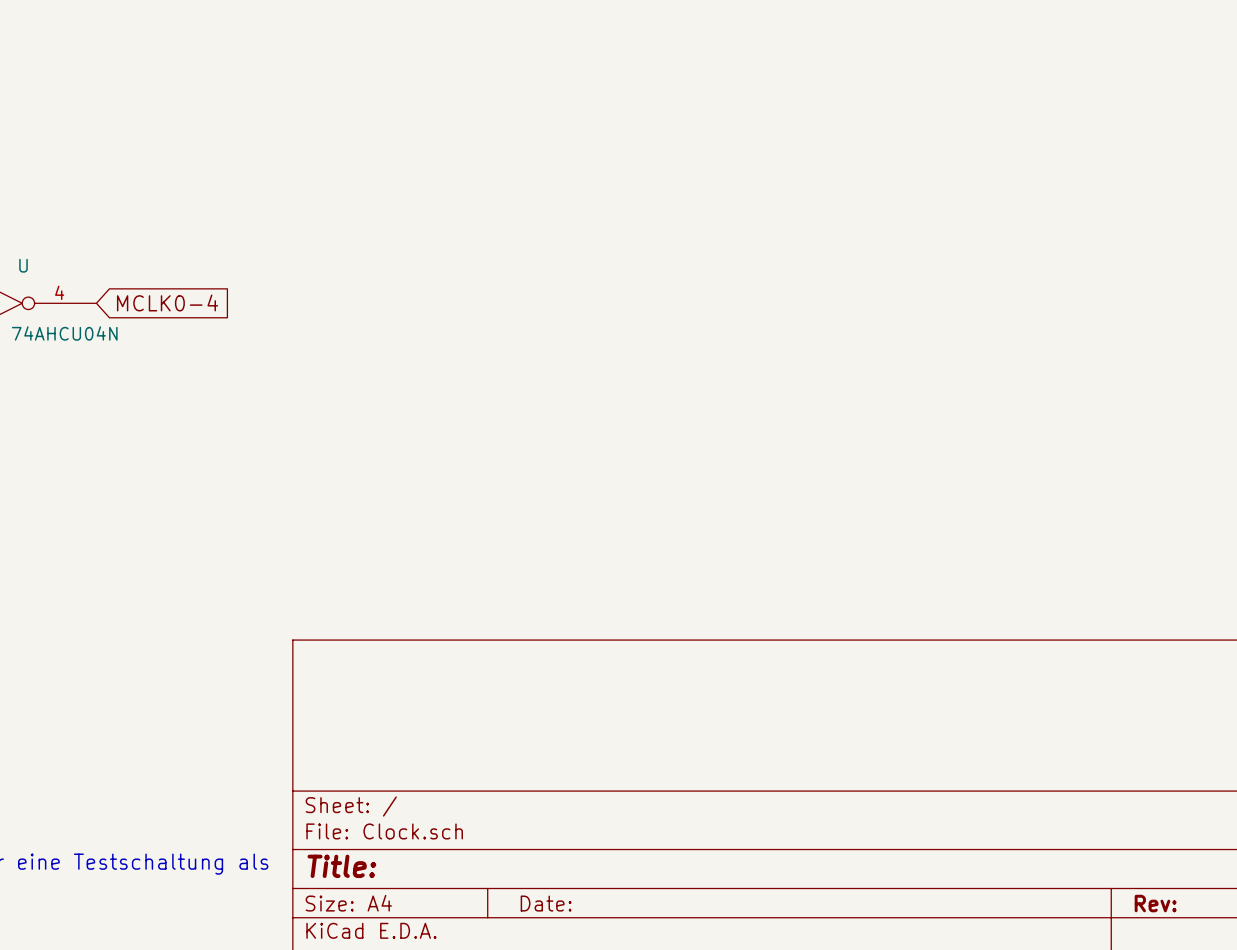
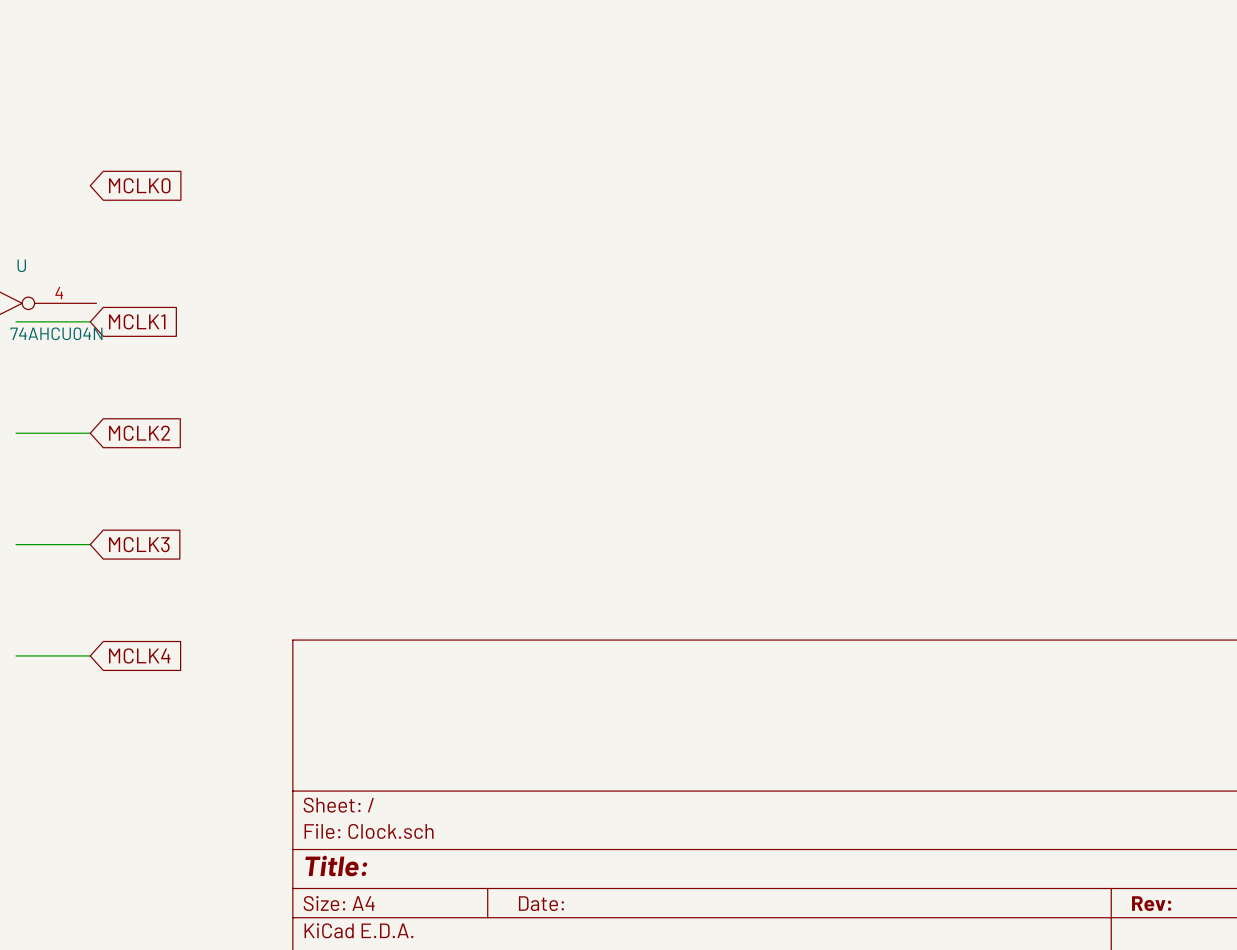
global label: none -> MCLK0 (139, 185)
global label: MCLK0-4 (167, 302) -> MCLK1 (137, 321)
wire: none -> (16, 321) (90, 321)
wire: none -> (16, 433) (90, 433)
global label: none -> MCLK2 (139, 433)
wire: none -> (16, 544) (90, 544)
global label: none -> MCLK3 (139, 544)
wire: none -> (16, 655) (90, 655)
global label: none -> MCLK4 (139, 655)

